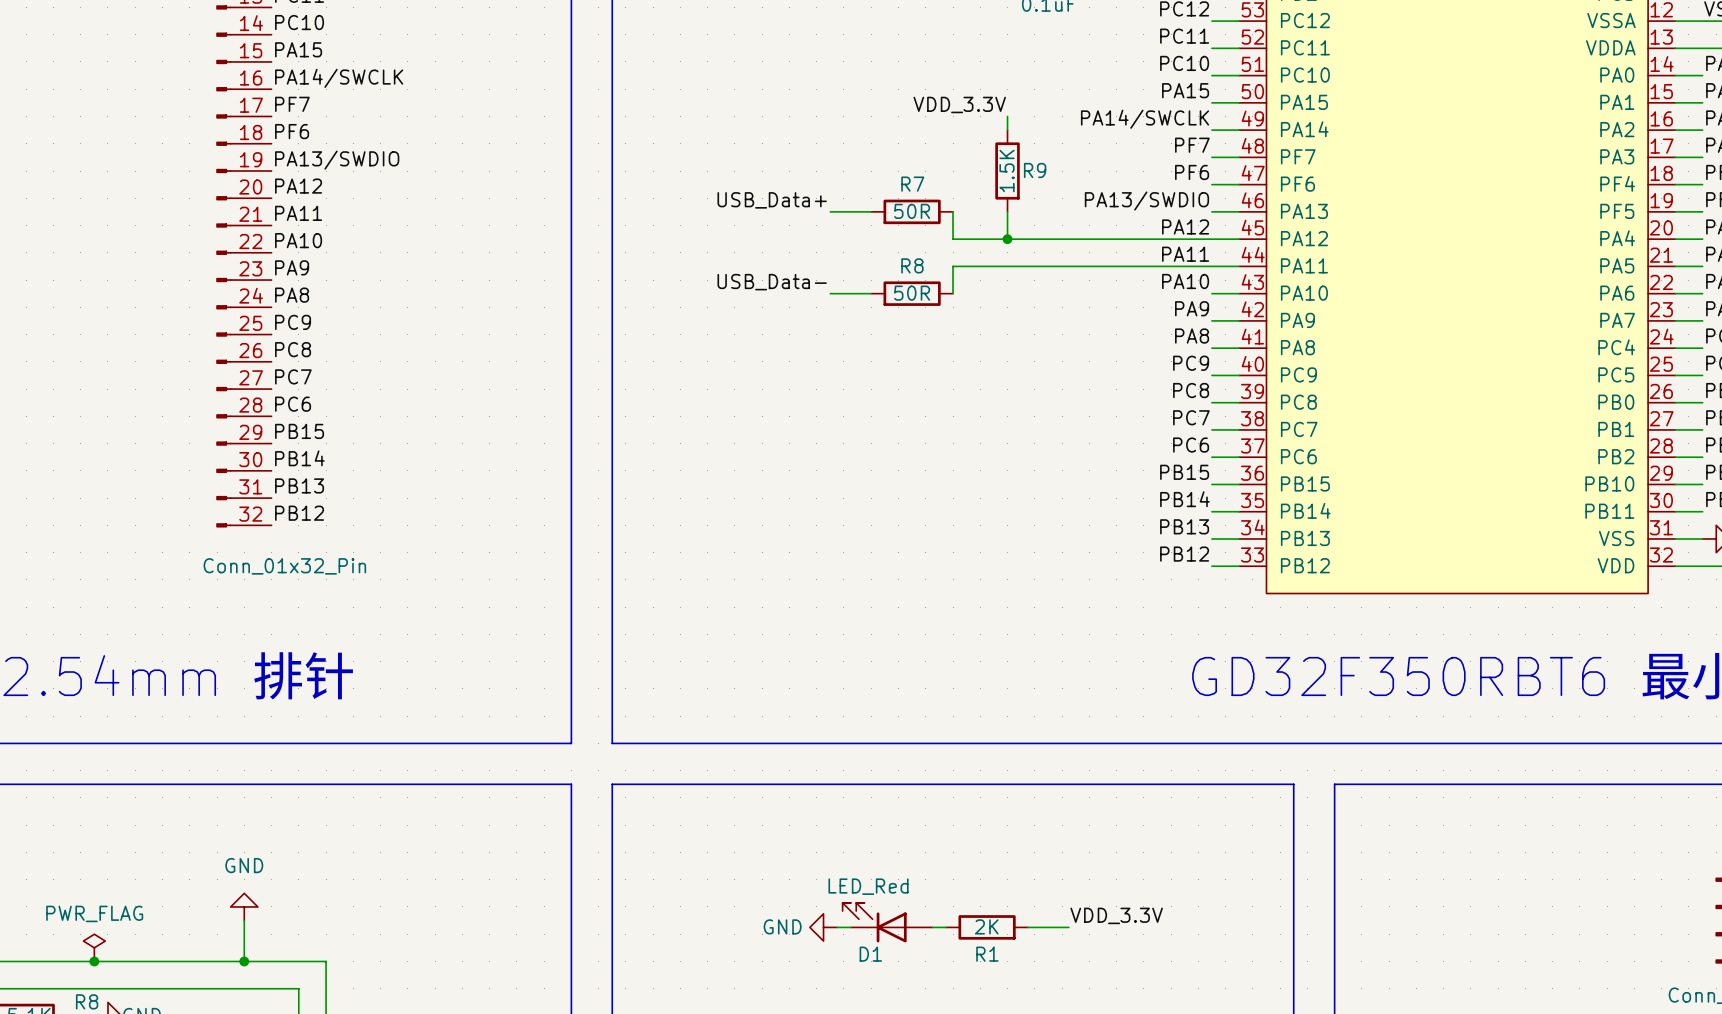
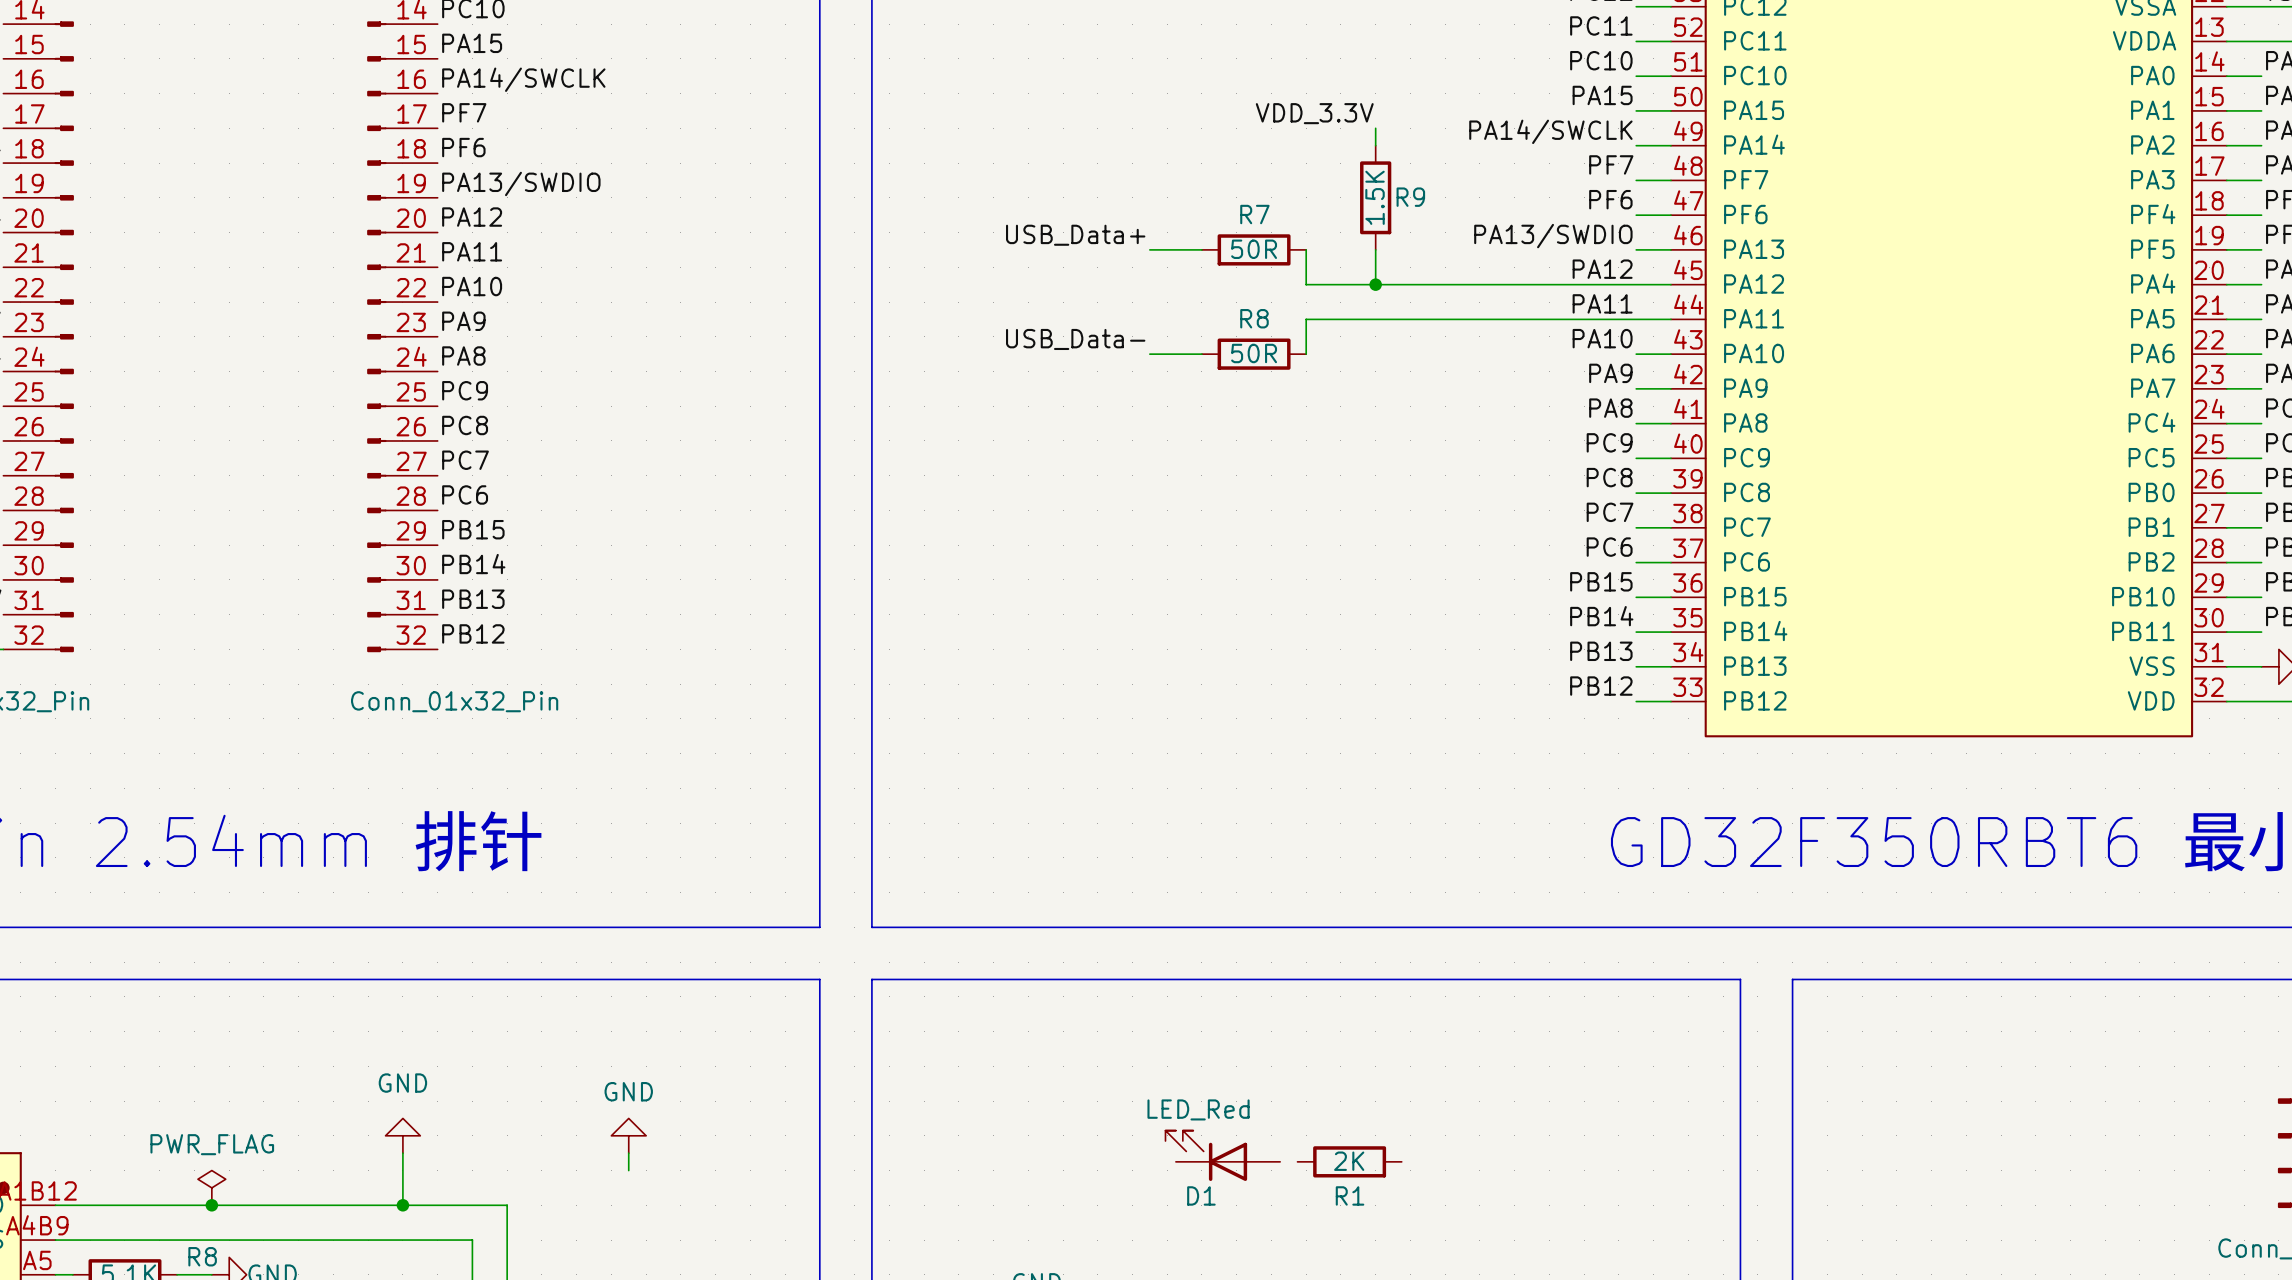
power symbol: none -> GND (628, 1135)
label: VDD_3.3V (1116, 915) -> none
wire: none -> (628, 1153) (628, 1170)
power symbol: GND (823, 927) -> none
wire: (837, 927) (850, 927) -> none
wire: (932, 927) (946, 927) -> none
wire: (1027, 927) (1068, 927) -> none

